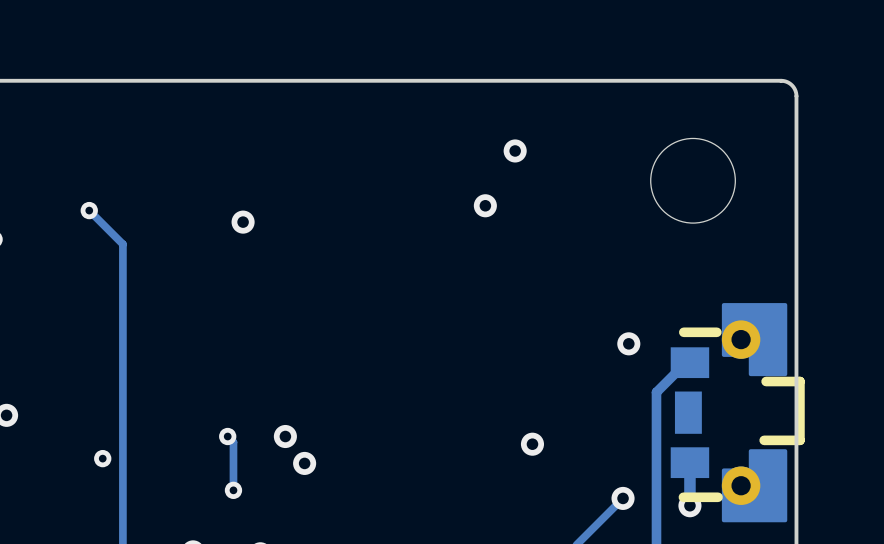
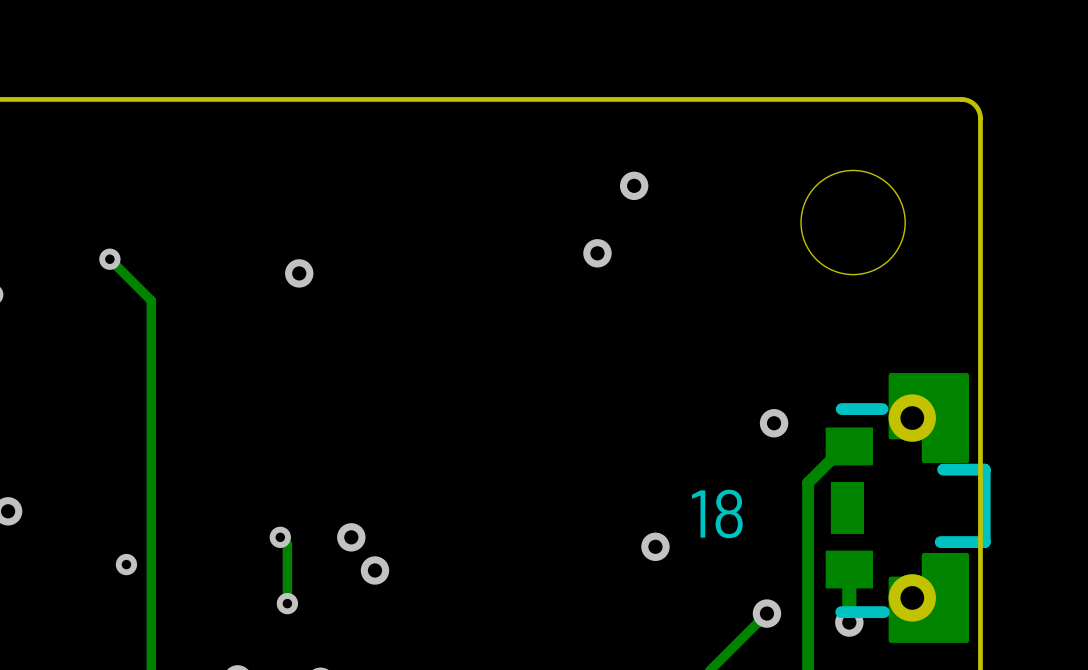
text: none -> 18 (717, 513)

